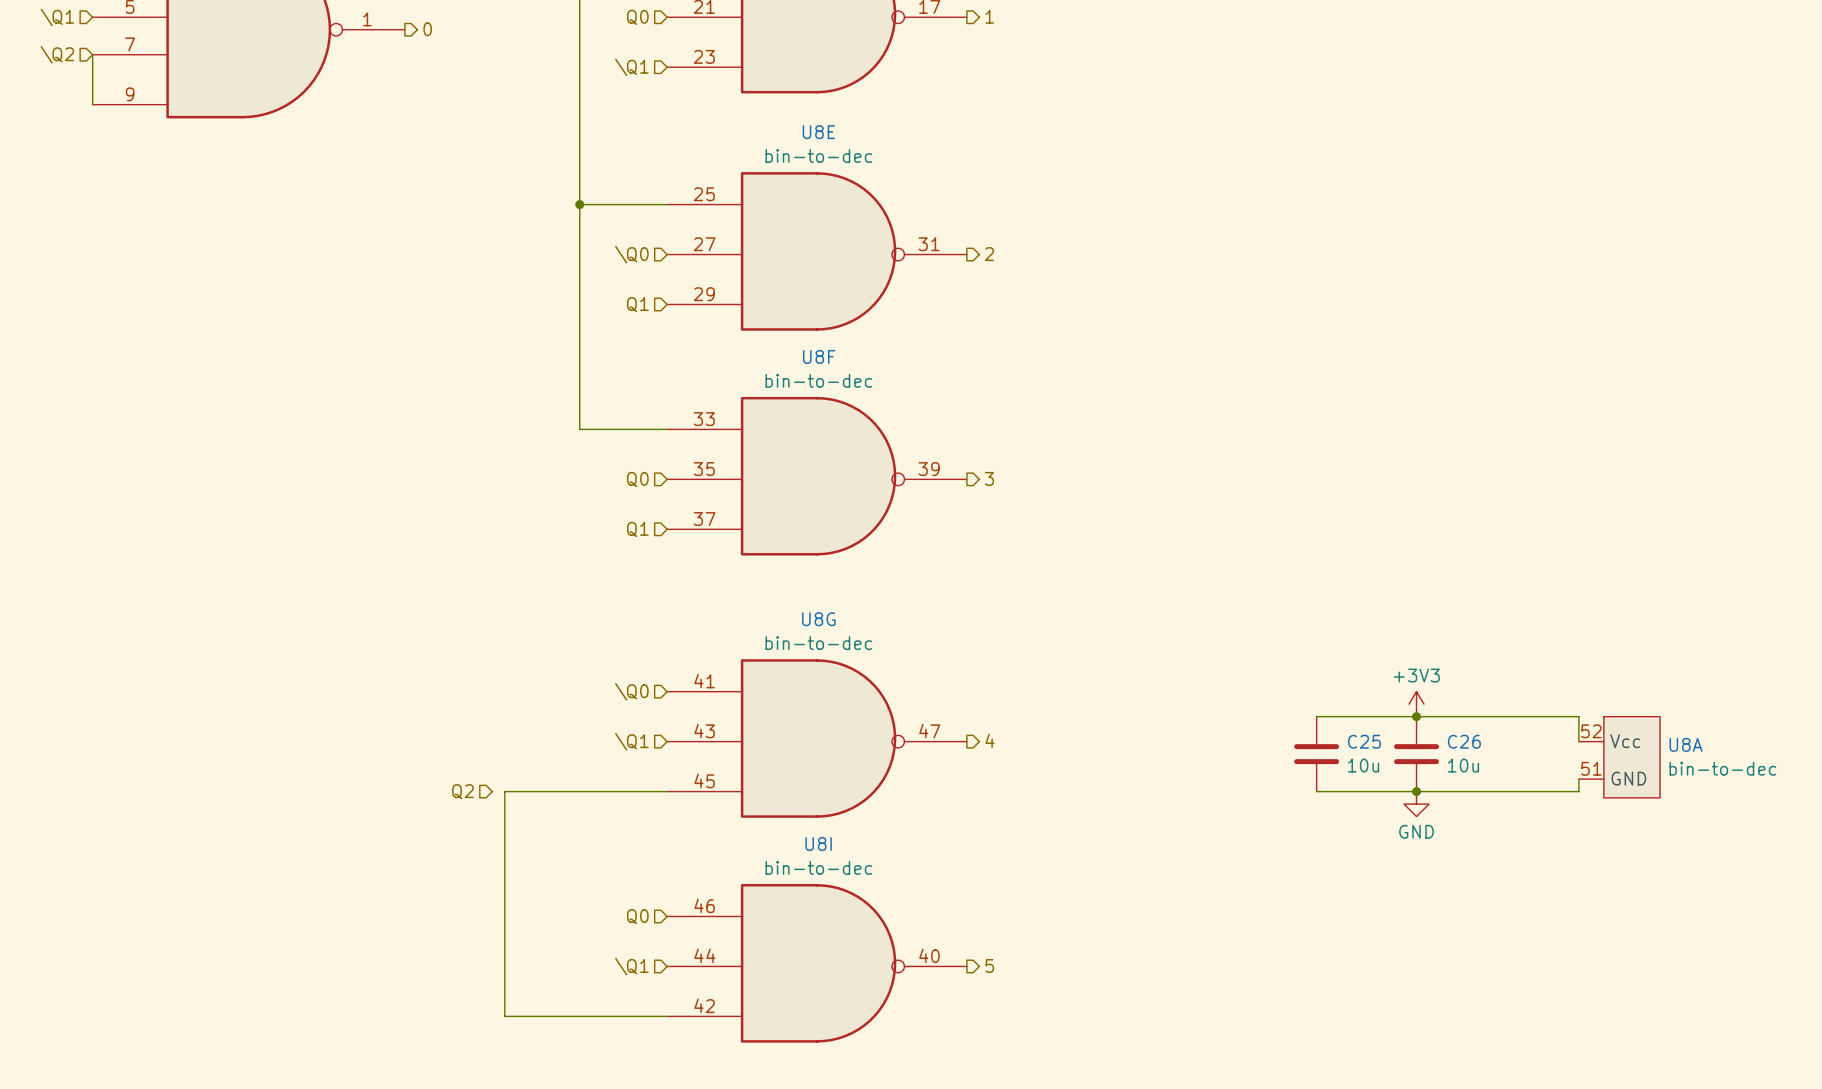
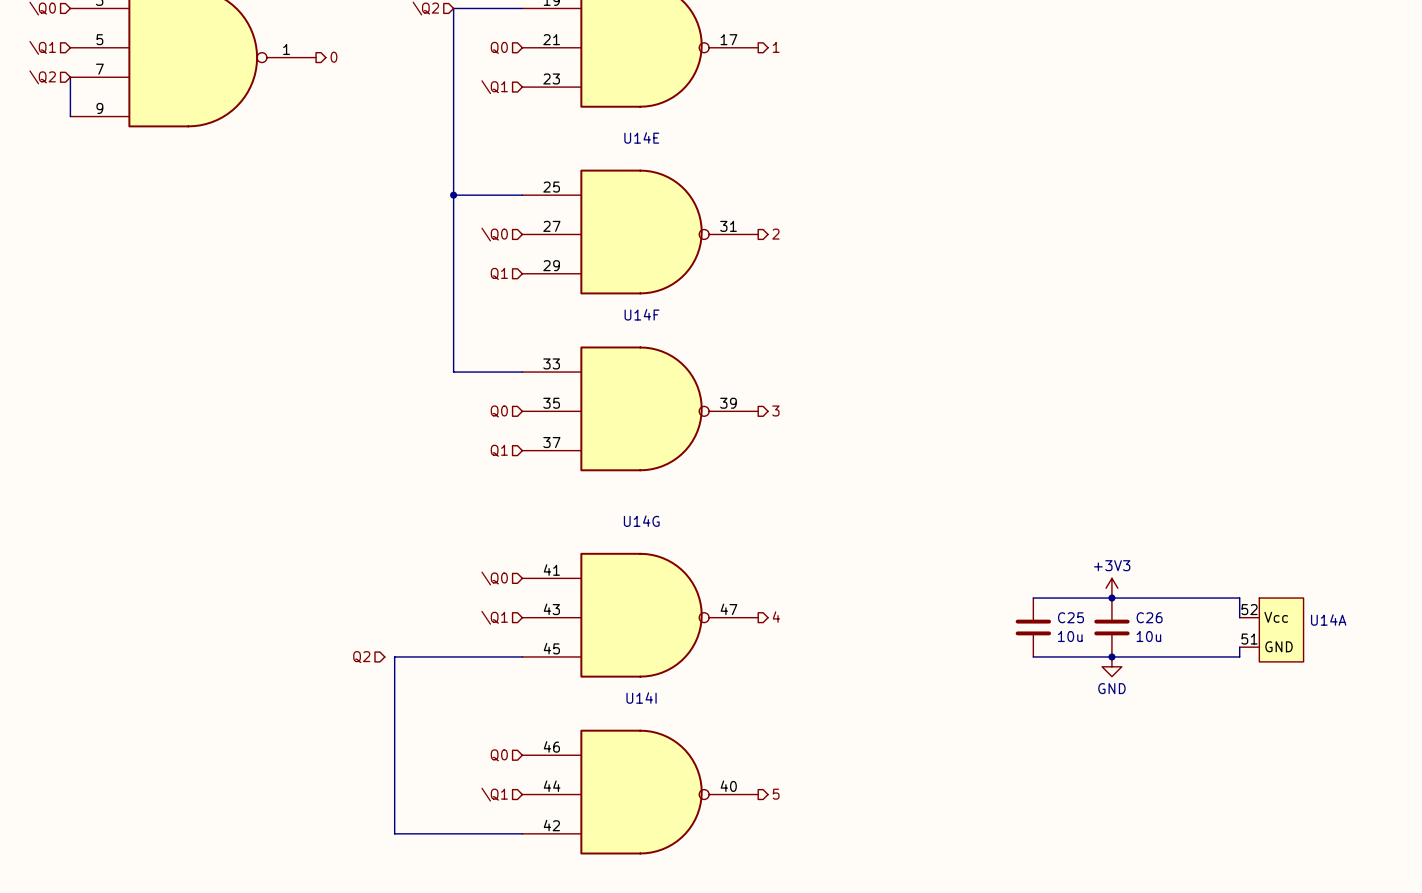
U8E name: U8E (818, 132) -> U14E (641, 137)
U8E value: bin-to-dec (818, 155) -> none
U8F name: U8F (819, 356) -> U14F (642, 314)
U8F value: bin-to-dec (818, 380) -> none
U8G name: U8G (818, 619) -> U14G (641, 521)
U8G value: bin-to-dec (818, 643) -> none
U8A name: U8A (1686, 744) -> U14A (1328, 619)
U8A value: bin-to-dec (1722, 768) -> none
U8I name: U8I (818, 844) -> U14I (641, 698)
U8I value: bin-to-dec (818, 867) -> none

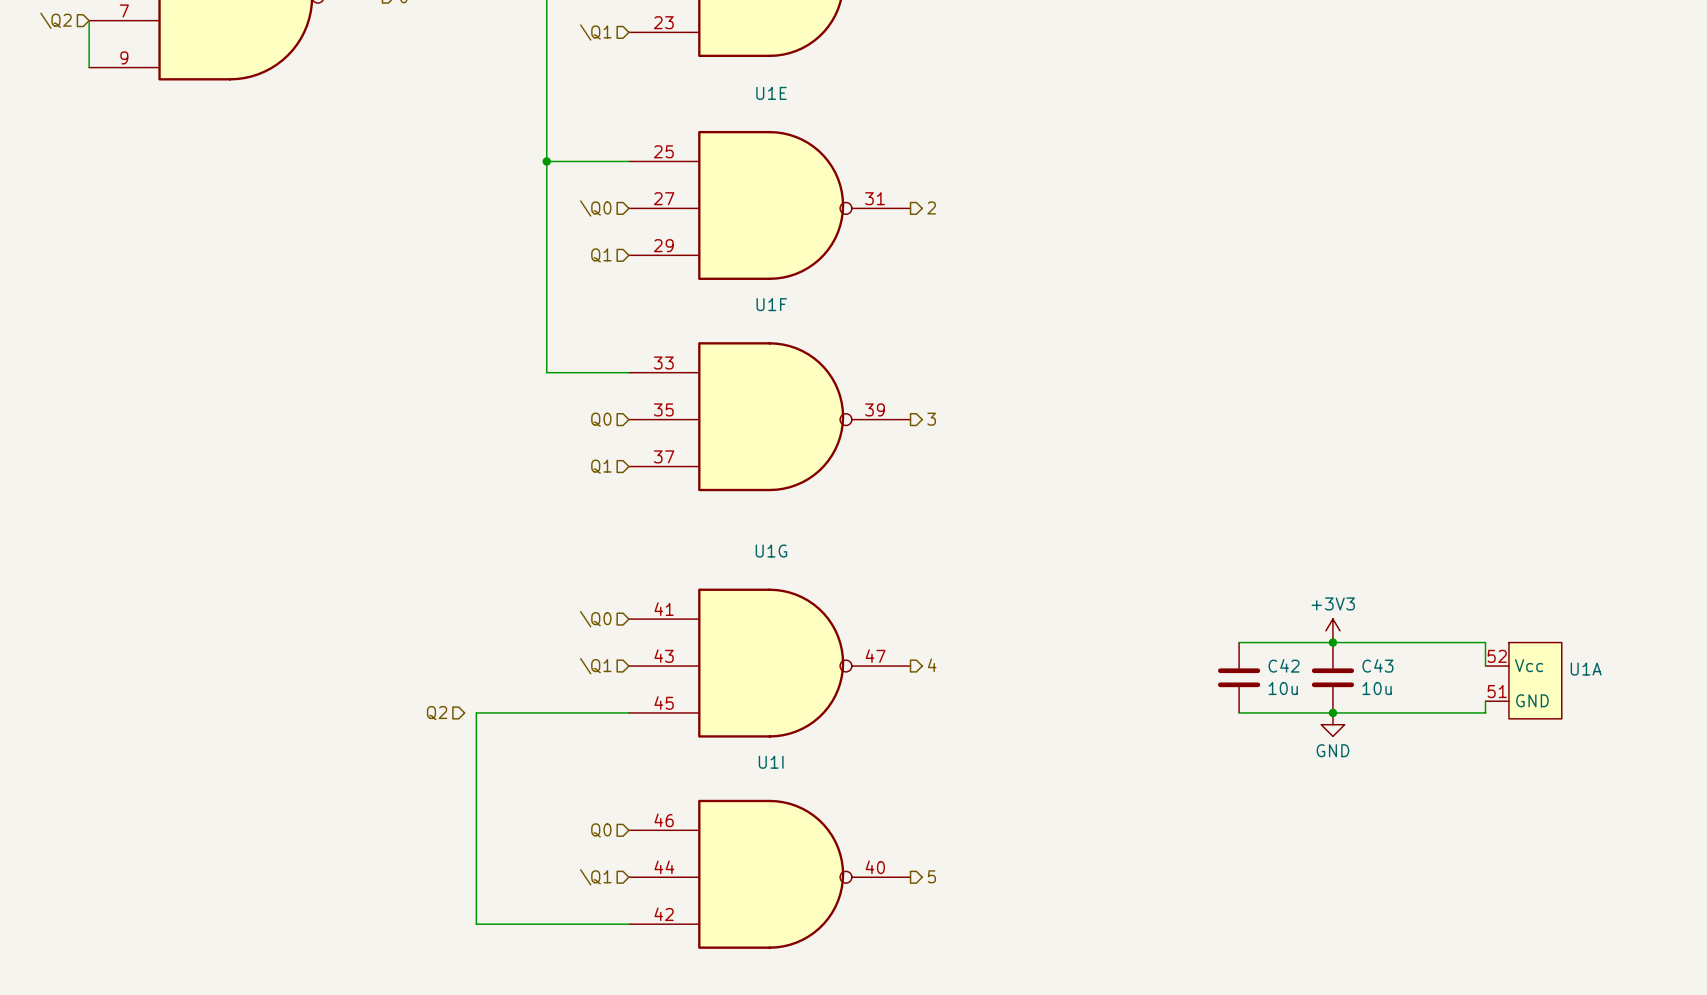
U14E name: U14E (641, 137) -> U1E (771, 93)
U14F name: U14F (642, 314) -> U1F (771, 304)
U14G name: U14G (641, 521) -> U1G (771, 551)
C25 name: C25 (1070, 617) -> C42 (1284, 665)
C26 name: C26 (1149, 617) -> C43 (1377, 665)
U14A name: U14A (1328, 619) -> U1A (1586, 669)
U14I name: U14I (641, 698) -> U1I (771, 762)

